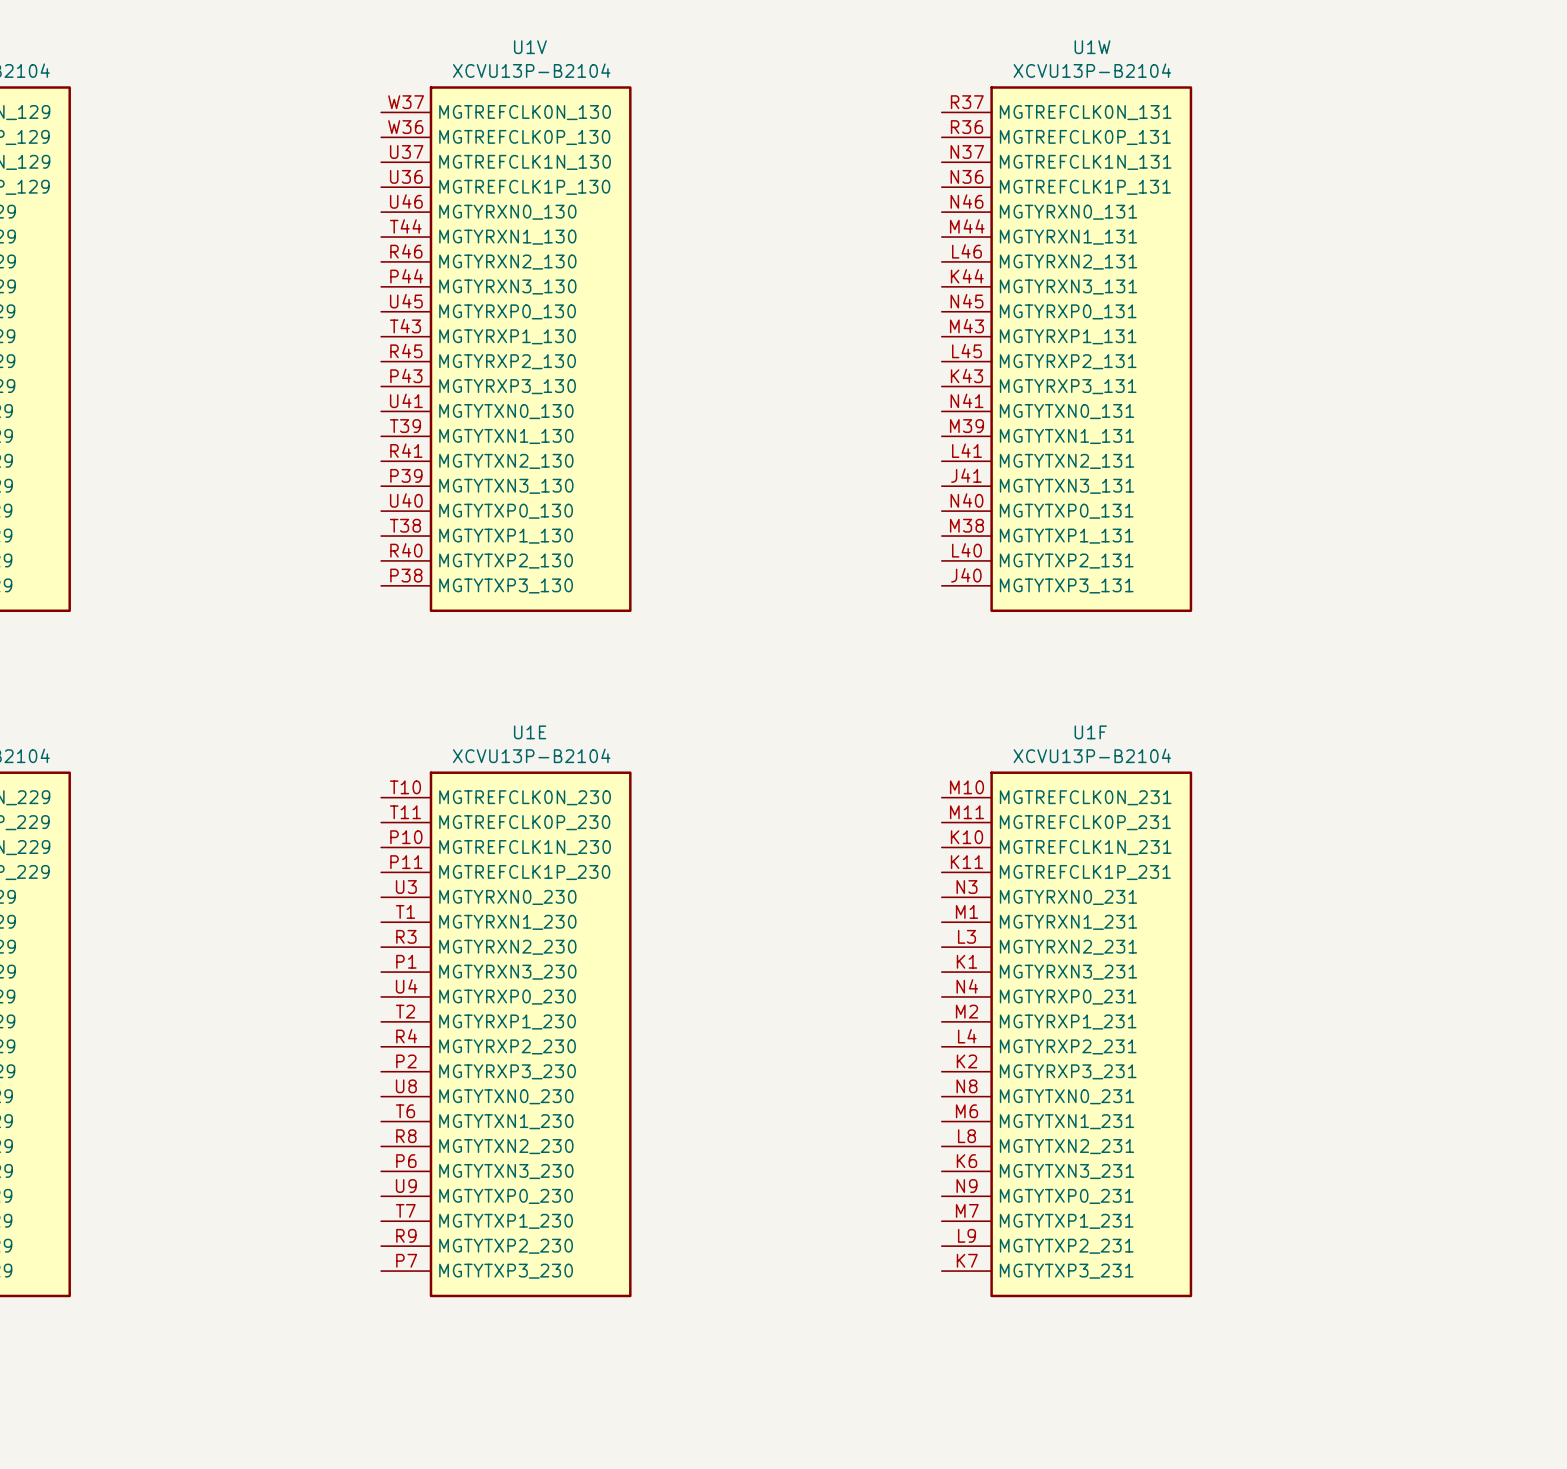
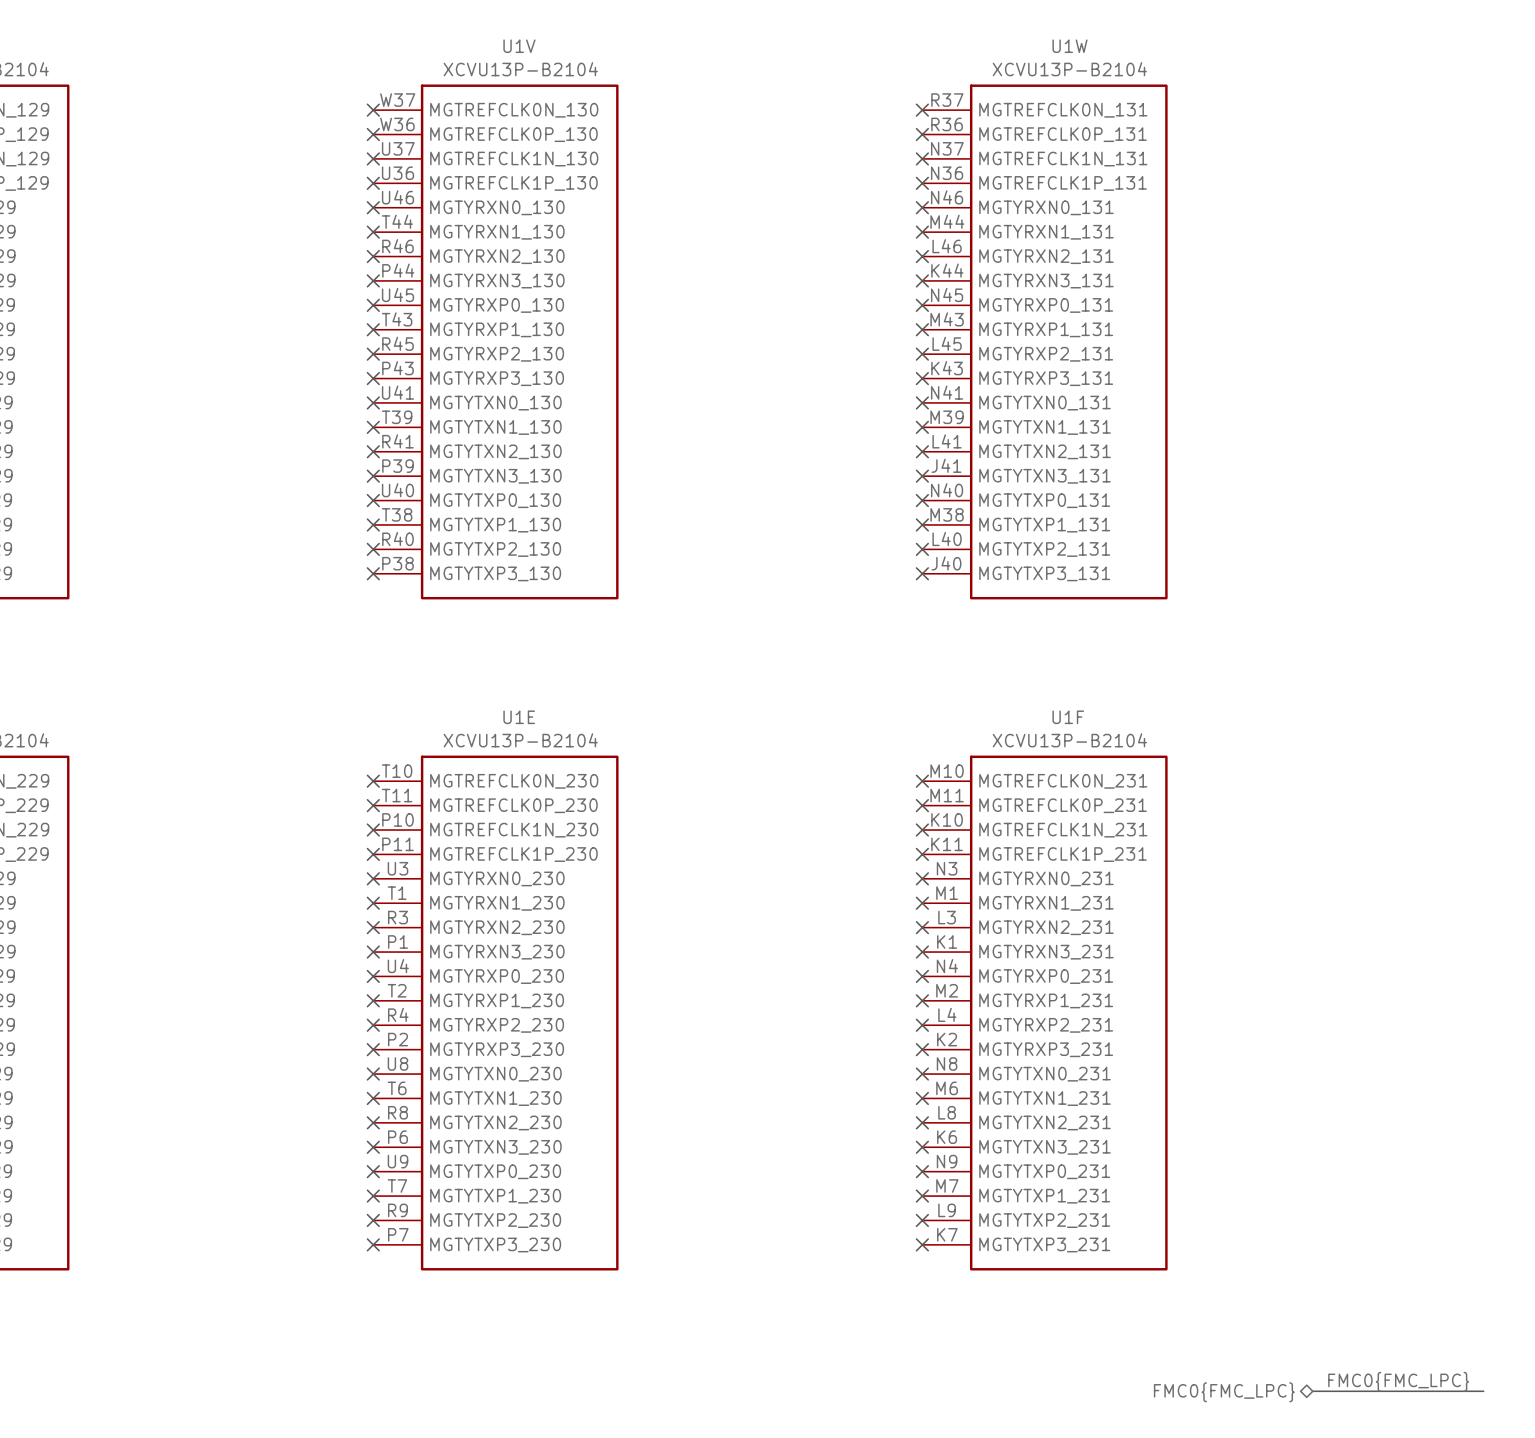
no-connect mark: none -> (373, 110)
no-connect mark: none -> (922, 110)
no-connect mark: none -> (373, 134)
no-connect mark: none -> (922, 134)
no-connect mark: none -> (373, 158)
no-connect mark: none -> (922, 158)
no-connect mark: none -> (373, 183)
no-connect mark: none -> (922, 183)
no-connect mark: none -> (373, 207)
no-connect mark: none -> (922, 207)
no-connect mark: none -> (373, 232)
no-connect mark: none -> (922, 232)
no-connect mark: none -> (373, 256)
no-connect mark: none -> (922, 256)
no-connect mark: none -> (373, 280)
no-connect mark: none -> (922, 280)
no-connect mark: none -> (373, 305)
no-connect mark: none -> (922, 305)
no-connect mark: none -> (373, 329)
no-connect mark: none -> (922, 329)
no-connect mark: none -> (373, 354)
no-connect mark: none -> (922, 354)
no-connect mark: none -> (373, 378)
no-connect mark: none -> (922, 378)
no-connect mark: none -> (373, 402)
no-connect mark: none -> (922, 402)
no-connect mark: none -> (373, 427)
no-connect mark: none -> (922, 427)
no-connect mark: none -> (373, 451)
no-connect mark: none -> (922, 451)
no-connect mark: none -> (373, 476)
no-connect mark: none -> (922, 476)
no-connect mark: none -> (373, 500)
no-connect mark: none -> (922, 500)
no-connect mark: none -> (373, 524)
no-connect mark: none -> (922, 524)
no-connect mark: none -> (373, 549)
no-connect mark: none -> (922, 549)
no-connect mark: none -> (373, 573)
no-connect mark: none -> (922, 573)
no-connect mark: none -> (373, 781)
no-connect mark: none -> (922, 781)
no-connect mark: none -> (373, 805)
no-connect mark: none -> (922, 805)
no-connect mark: none -> (373, 830)
no-connect mark: none -> (922, 830)
no-connect mark: none -> (373, 854)
no-connect mark: none -> (922, 854)
no-connect mark: none -> (373, 878)
no-connect mark: none -> (922, 878)
no-connect mark: none -> (373, 903)
no-connect mark: none -> (922, 903)
no-connect mark: none -> (373, 927)
no-connect mark: none -> (922, 927)
no-connect mark: none -> (373, 952)
no-connect mark: none -> (922, 952)
no-connect mark: none -> (373, 976)
no-connect mark: none -> (922, 976)
no-connect mark: none -> (373, 1000)
no-connect mark: none -> (922, 1000)
no-connect mark: none -> (373, 1025)
no-connect mark: none -> (922, 1025)
no-connect mark: none -> (373, 1049)
no-connect mark: none -> (922, 1049)
no-connect mark: none -> (373, 1074)
no-connect mark: none -> (922, 1074)
no-connect mark: none -> (373, 1098)
no-connect mark: none -> (922, 1098)
no-connect mark: none -> (373, 1122)
no-connect mark: none -> (922, 1122)
no-connect mark: none -> (373, 1147)
no-connect mark: none -> (922, 1147)
no-connect mark: none -> (373, 1171)
no-connect mark: none -> (922, 1171)
no-connect mark: none -> (373, 1196)
no-connect mark: none -> (922, 1196)
no-connect mark: none -> (373, 1220)
no-connect mark: none -> (922, 1220)
no-connect mark: none -> (373, 1244)
no-connect mark: none -> (922, 1244)
label: none -> FMC0{FMC_LPC} (1398, 1381)
bus: none -> (1312, 1391) (1483, 1391)
hierarchical label: none -> FMC0{FMC_LPC} (1224, 1392)

